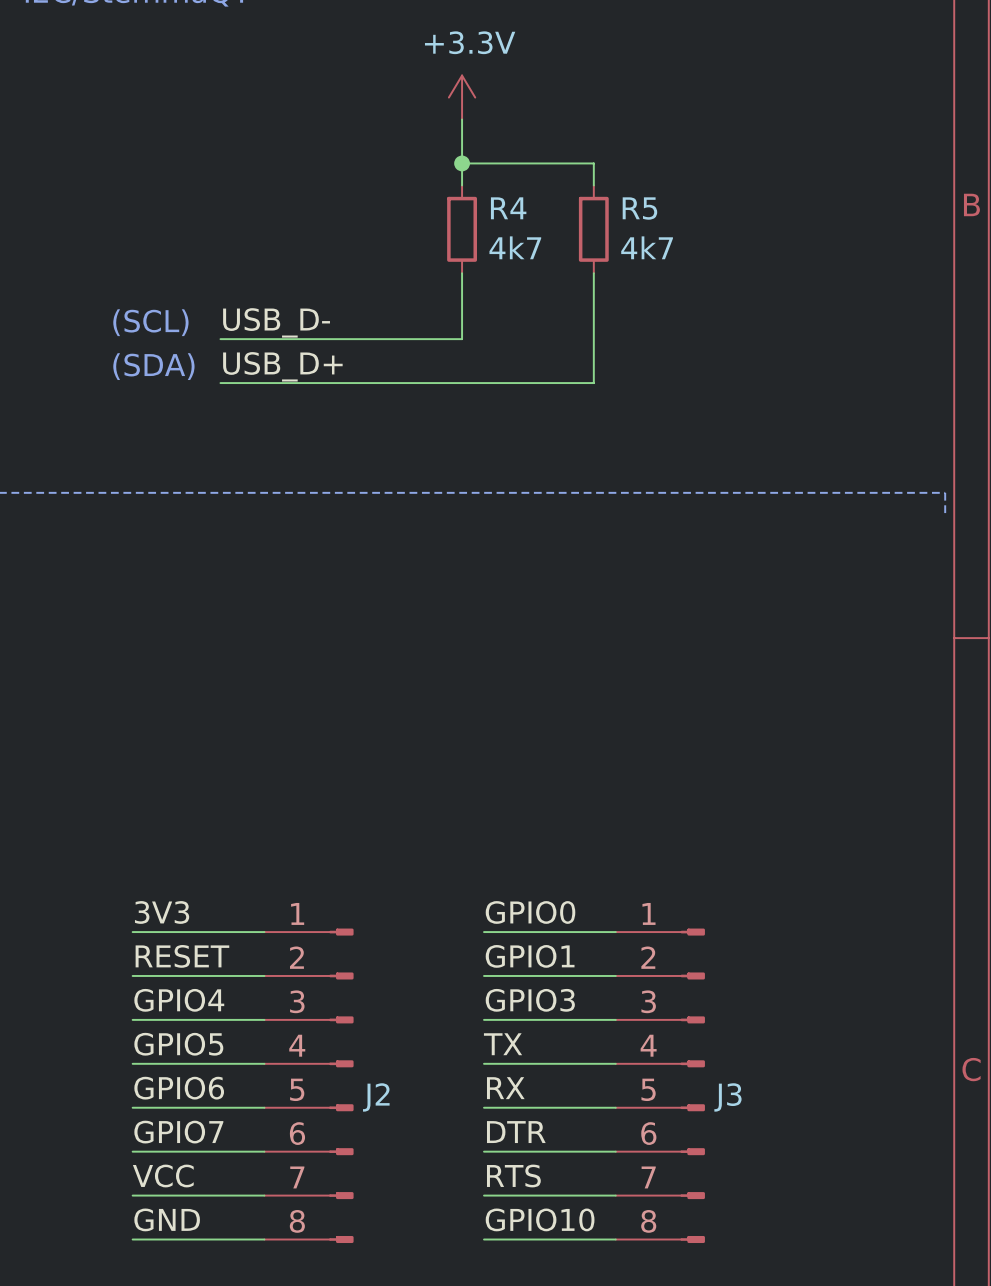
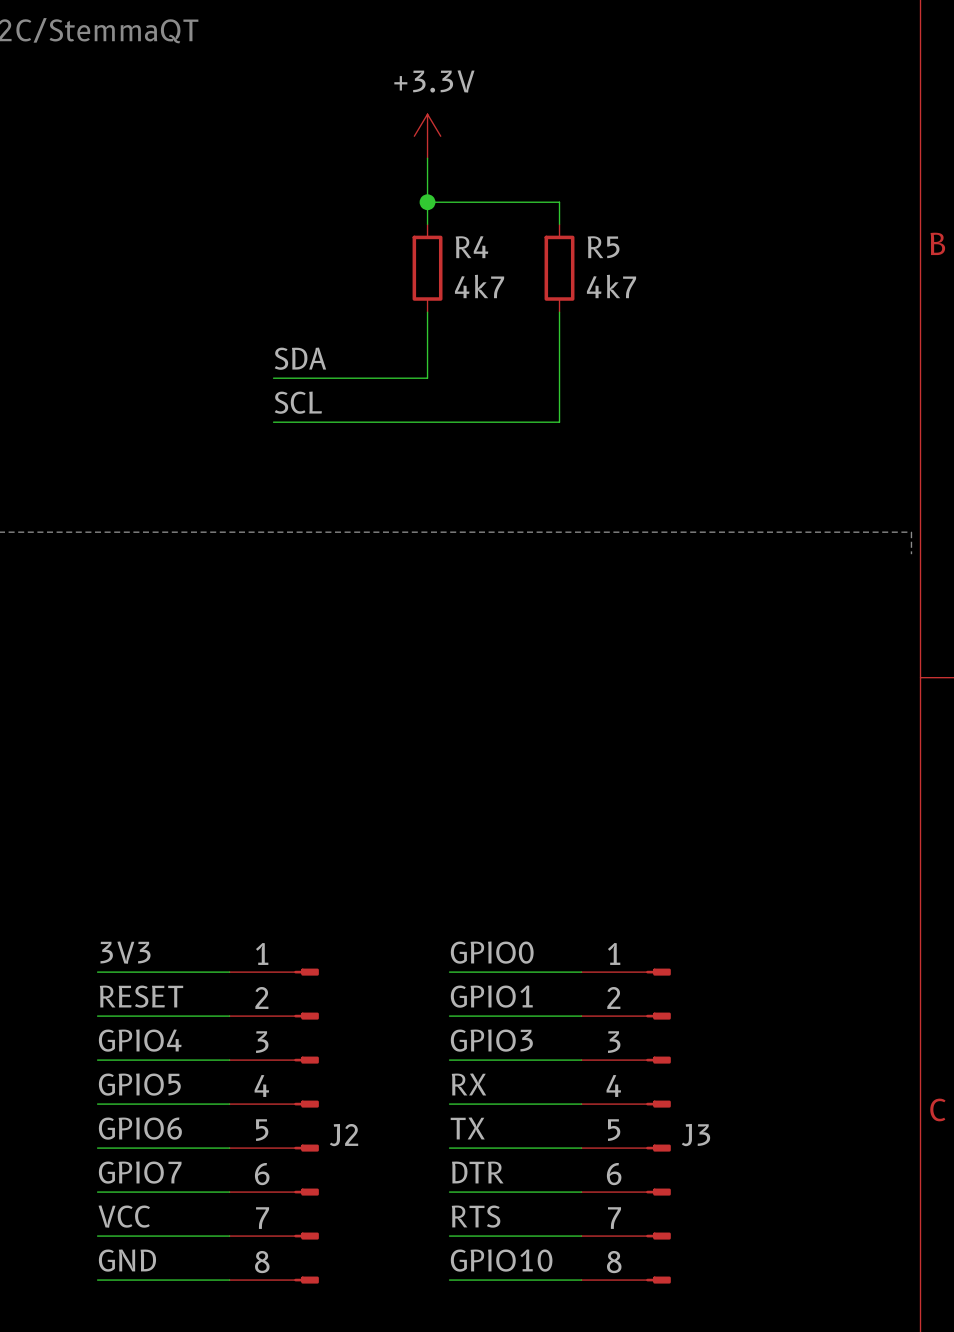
label: none -> SDA (300, 358)
text: (SCL) (150, 322) -> none
label: USB_D- (276, 322) -> none
wire: (220, 339) (308, 339) -> none
label: none -> SCL (298, 402)
text: (SDA) (153, 366) -> none
label: USB_D+ (282, 366) -> none
wire: (220, 383) (308, 383) -> none
label: TX (503, 1044) -> RX (468, 1084)
label: RX (505, 1088) -> TX (467, 1128)

